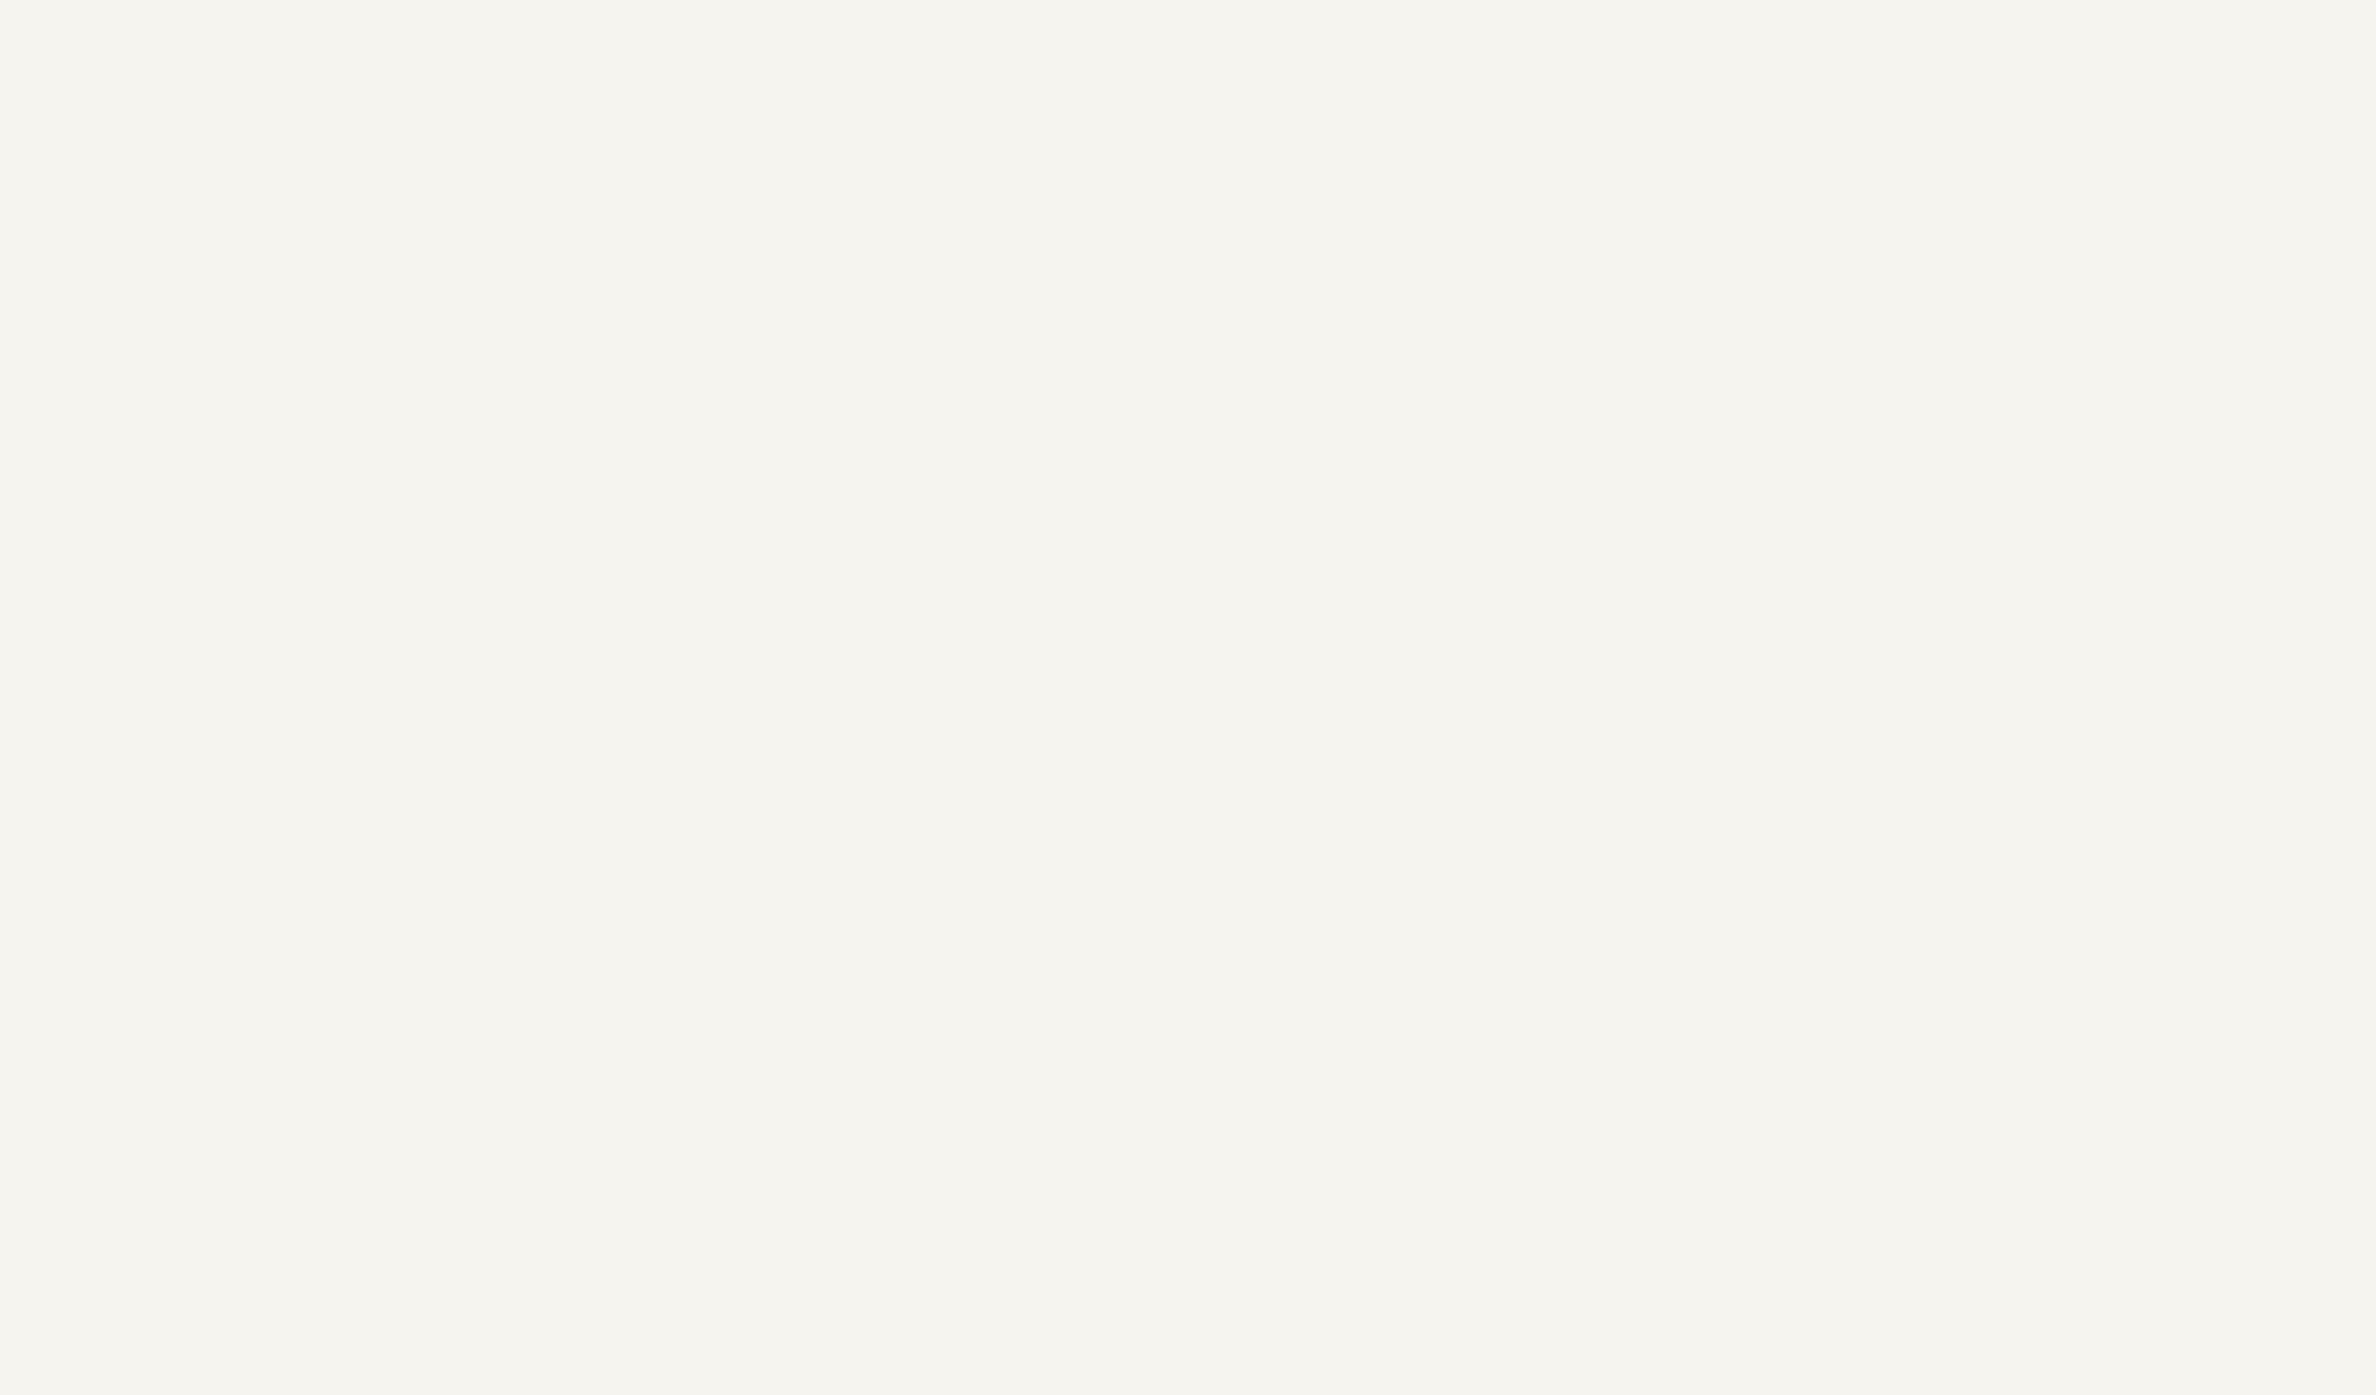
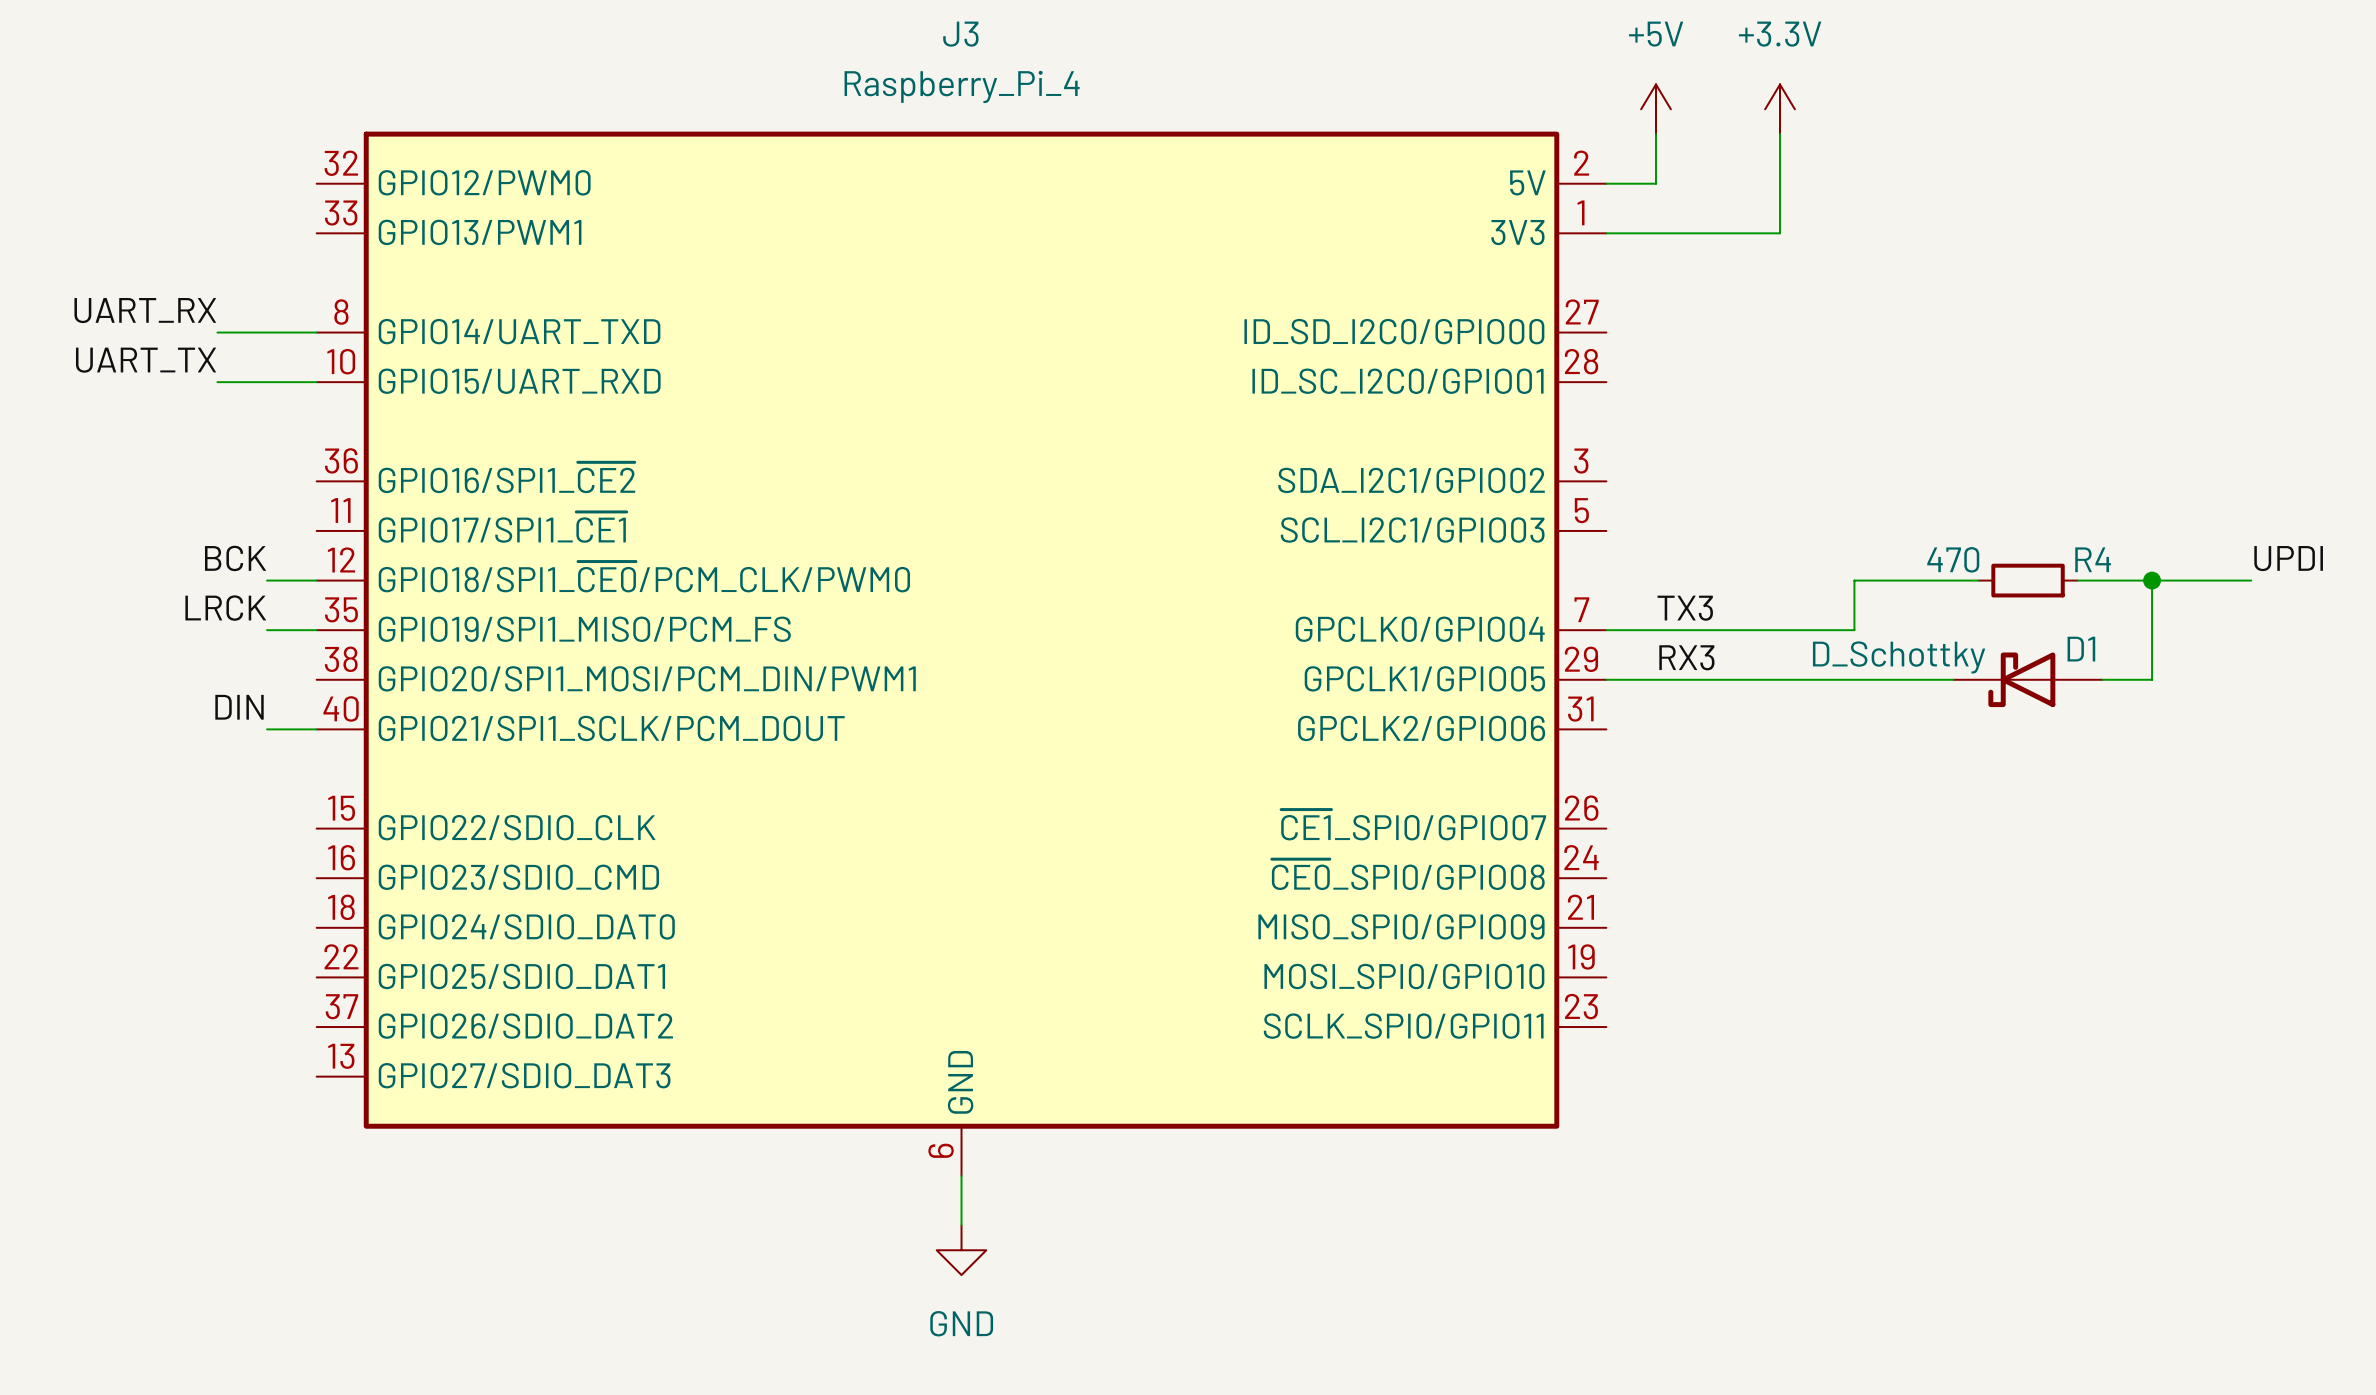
power symbol: none -> +5V (1656, 109)
power symbol: none -> +3.3V (1780, 109)
wire: none -> (1656, 134) (1656, 183) (1606, 183)
wire: none -> (1780, 134) (1780, 233) (1606, 233)
label: none -> UART_RX (145, 310)
wire: none -> (217, 332) (316, 332)
label: none -> UART_TX (146, 360)
wire: none -> (217, 382) (316, 382)
label: none -> BCK (235, 558)
label: none -> UPDI (2288, 558)
wire: none -> (267, 580) (316, 580)
wire: none -> (1978, 580) (1854, 580) (1854, 630) (1606, 630)
R4: none -> 470 (2028, 580)
wire: none -> (2077, 580) (2251, 580)
wire: none -> (2152, 580) (2152, 679) (2102, 679)
junction: none -> (2152, 580)
label: none -> LRCK (225, 608)
label: none -> TX3 (1685, 608)
wire: none -> (267, 630) (316, 630)
J3: none -> Raspberry_Pi_4 (961, 653)
label: none -> RX3 (1686, 657)
wire: none -> (1606, 679) (1953, 679)
D1: none -> D_Schottky (2028, 679)
label: none -> DIN (239, 707)
wire: none -> (267, 729) (316, 729)
wire: none -> (961, 1175) (961, 1225)
power symbol: none -> GND (961, 1250)

